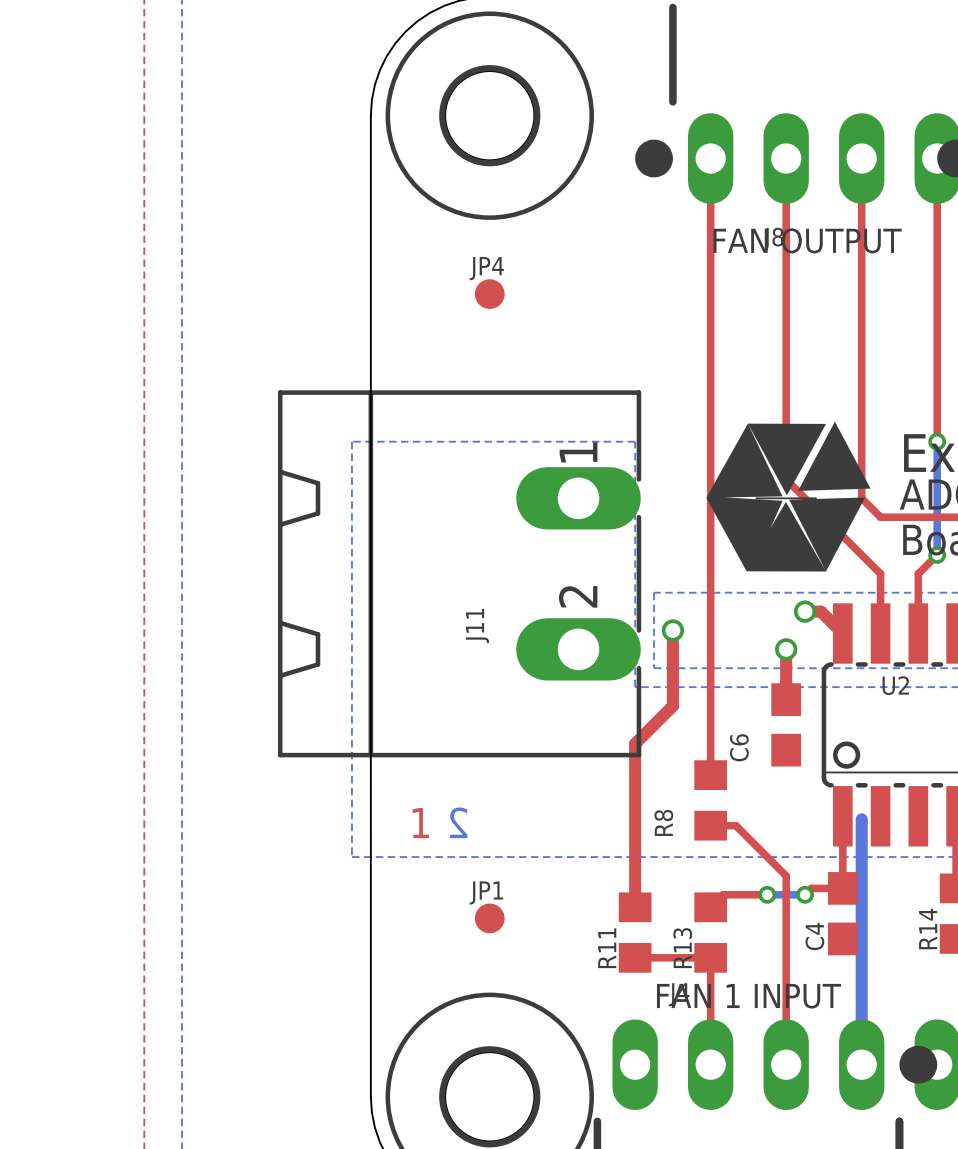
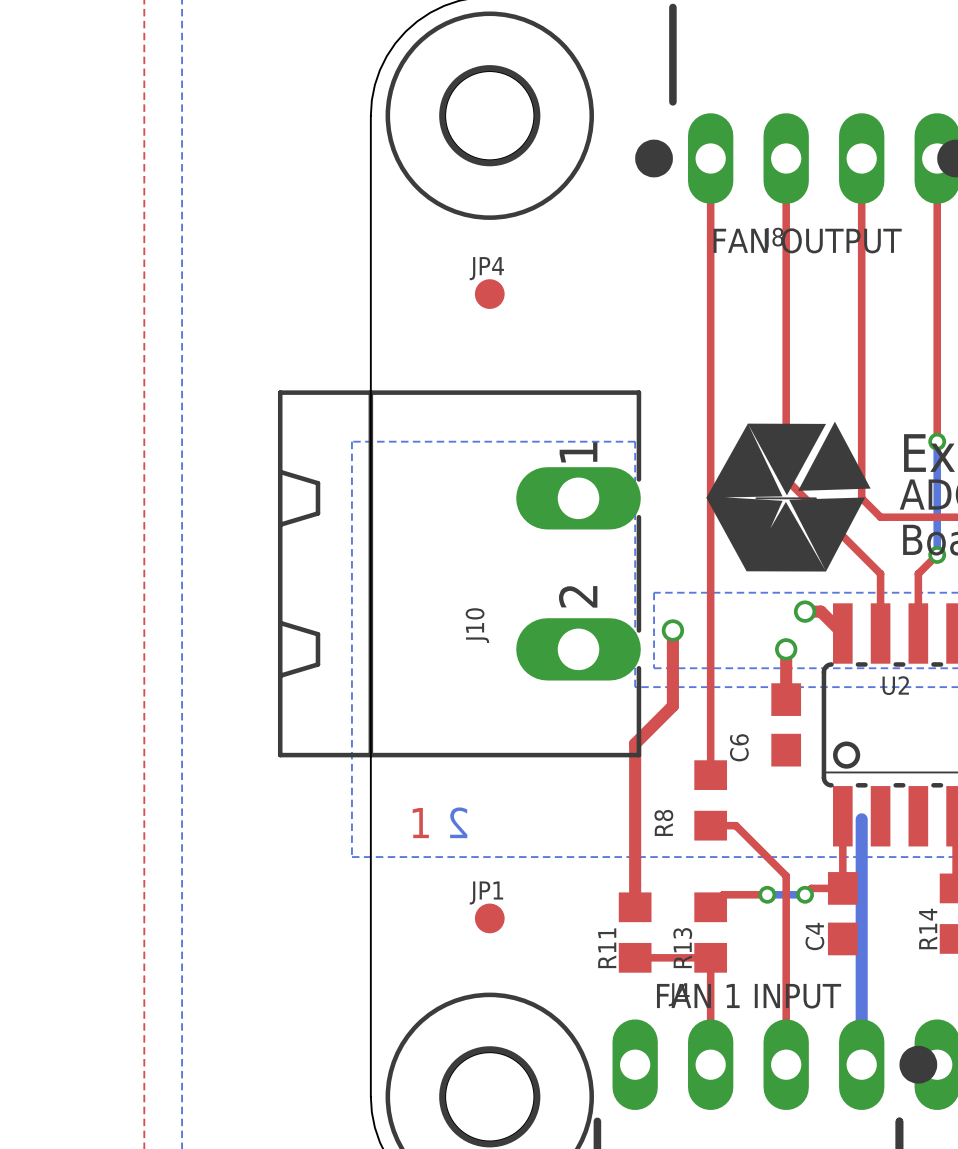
J11 name: J11 (477, 625) -> J10 (477, 625)

